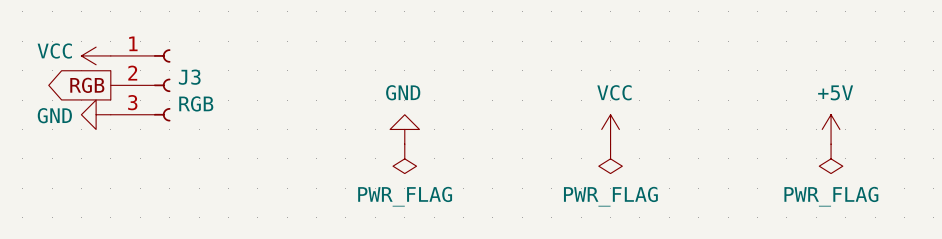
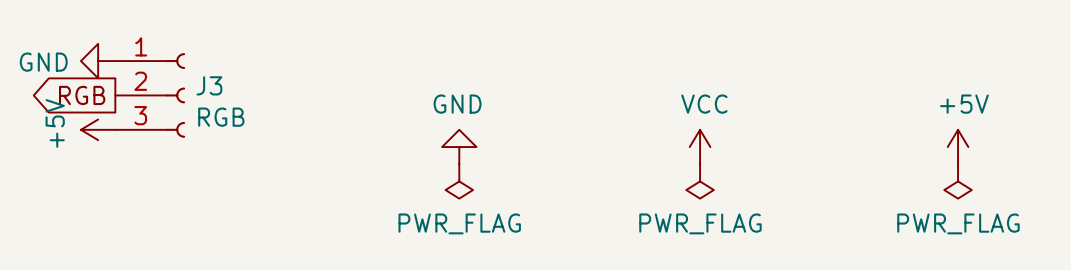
power symbol: VCC (96, 55) -> GND (98, 61)
power symbol: GND (96, 114) -> +5V (98, 129)

